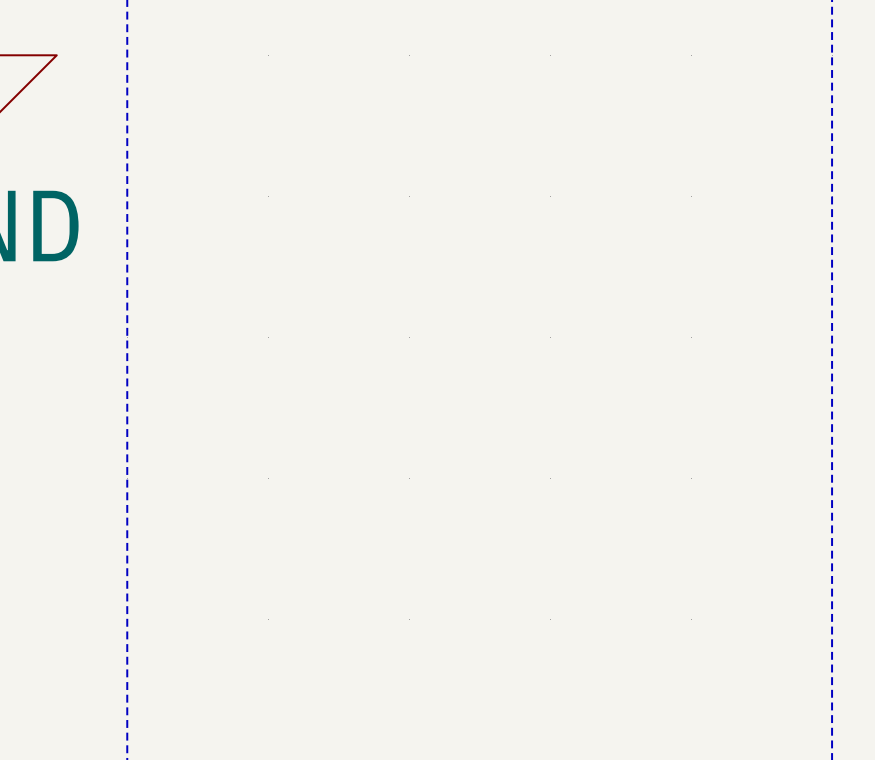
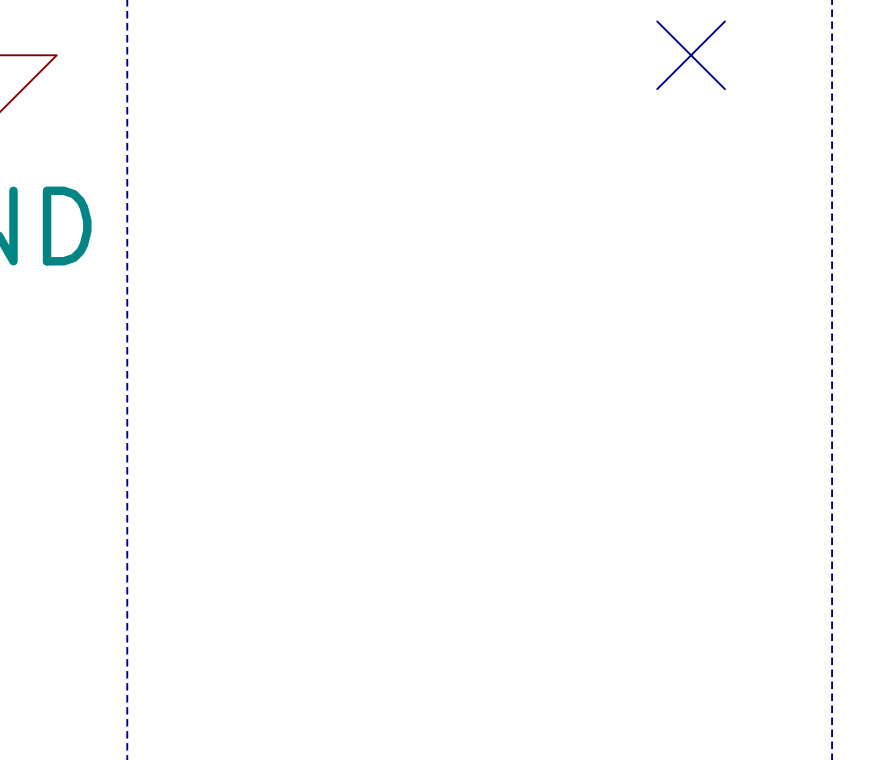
no-connect mark: none -> (691, 55)

